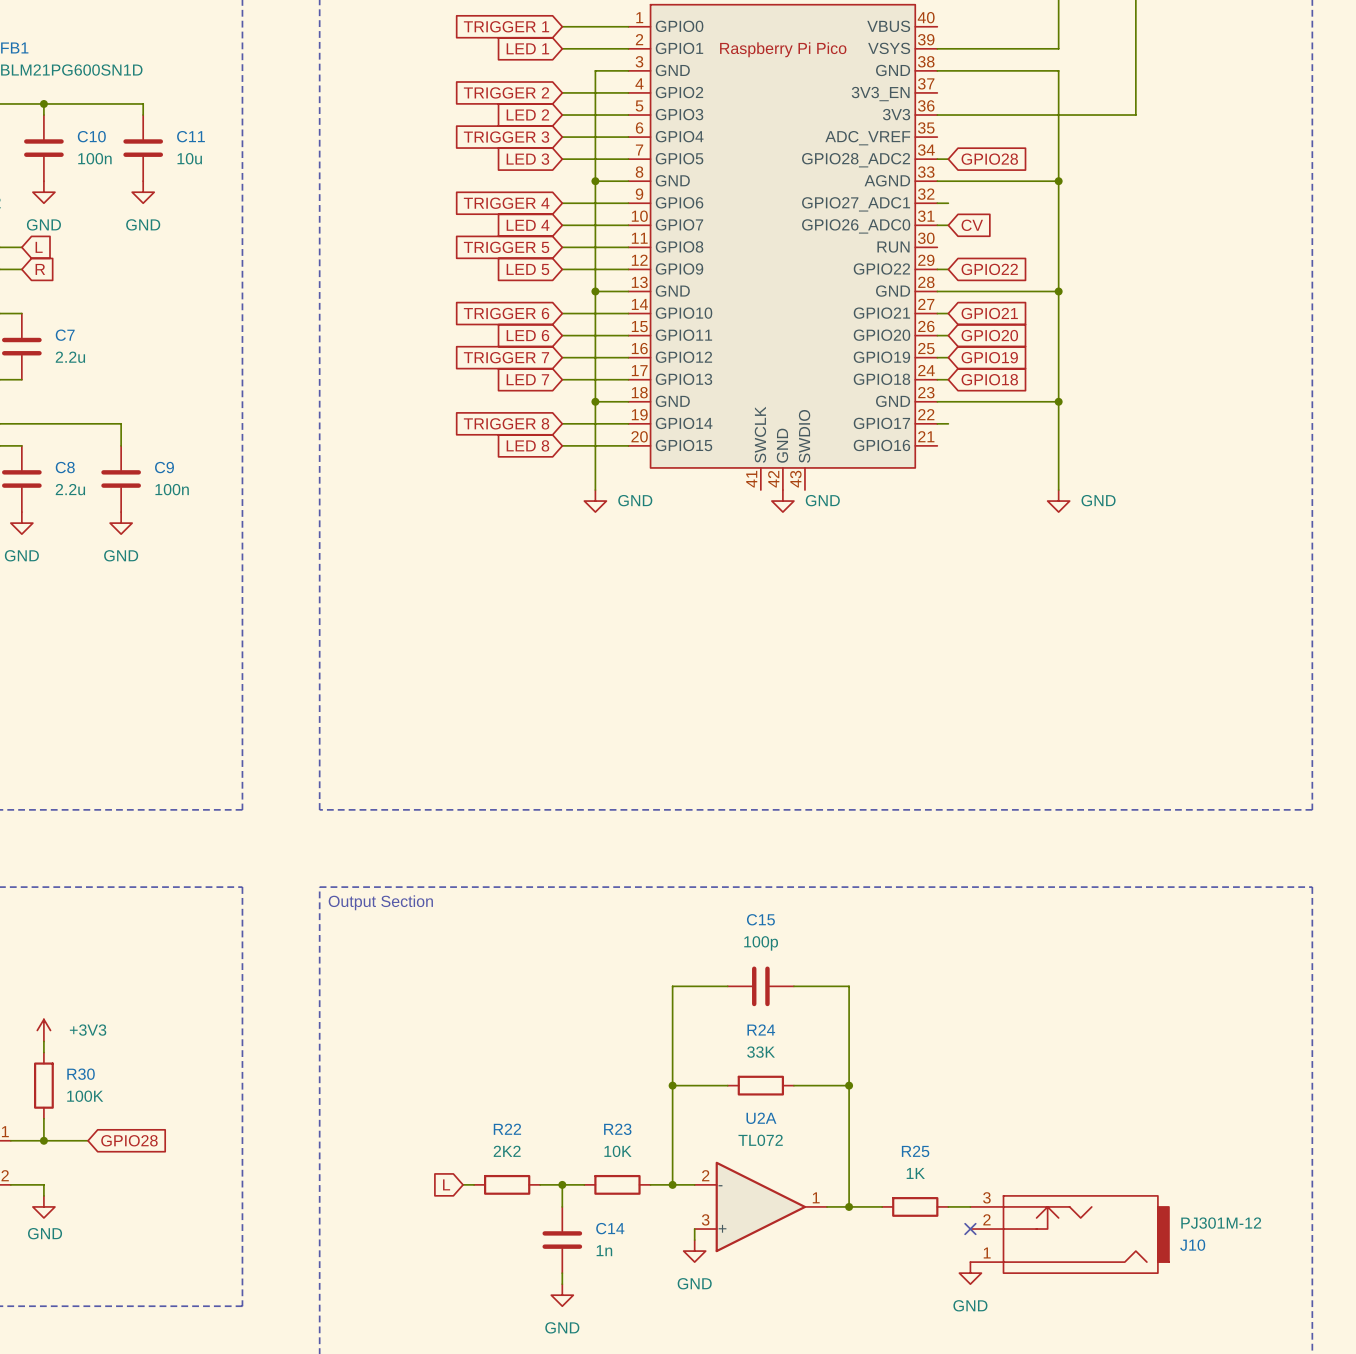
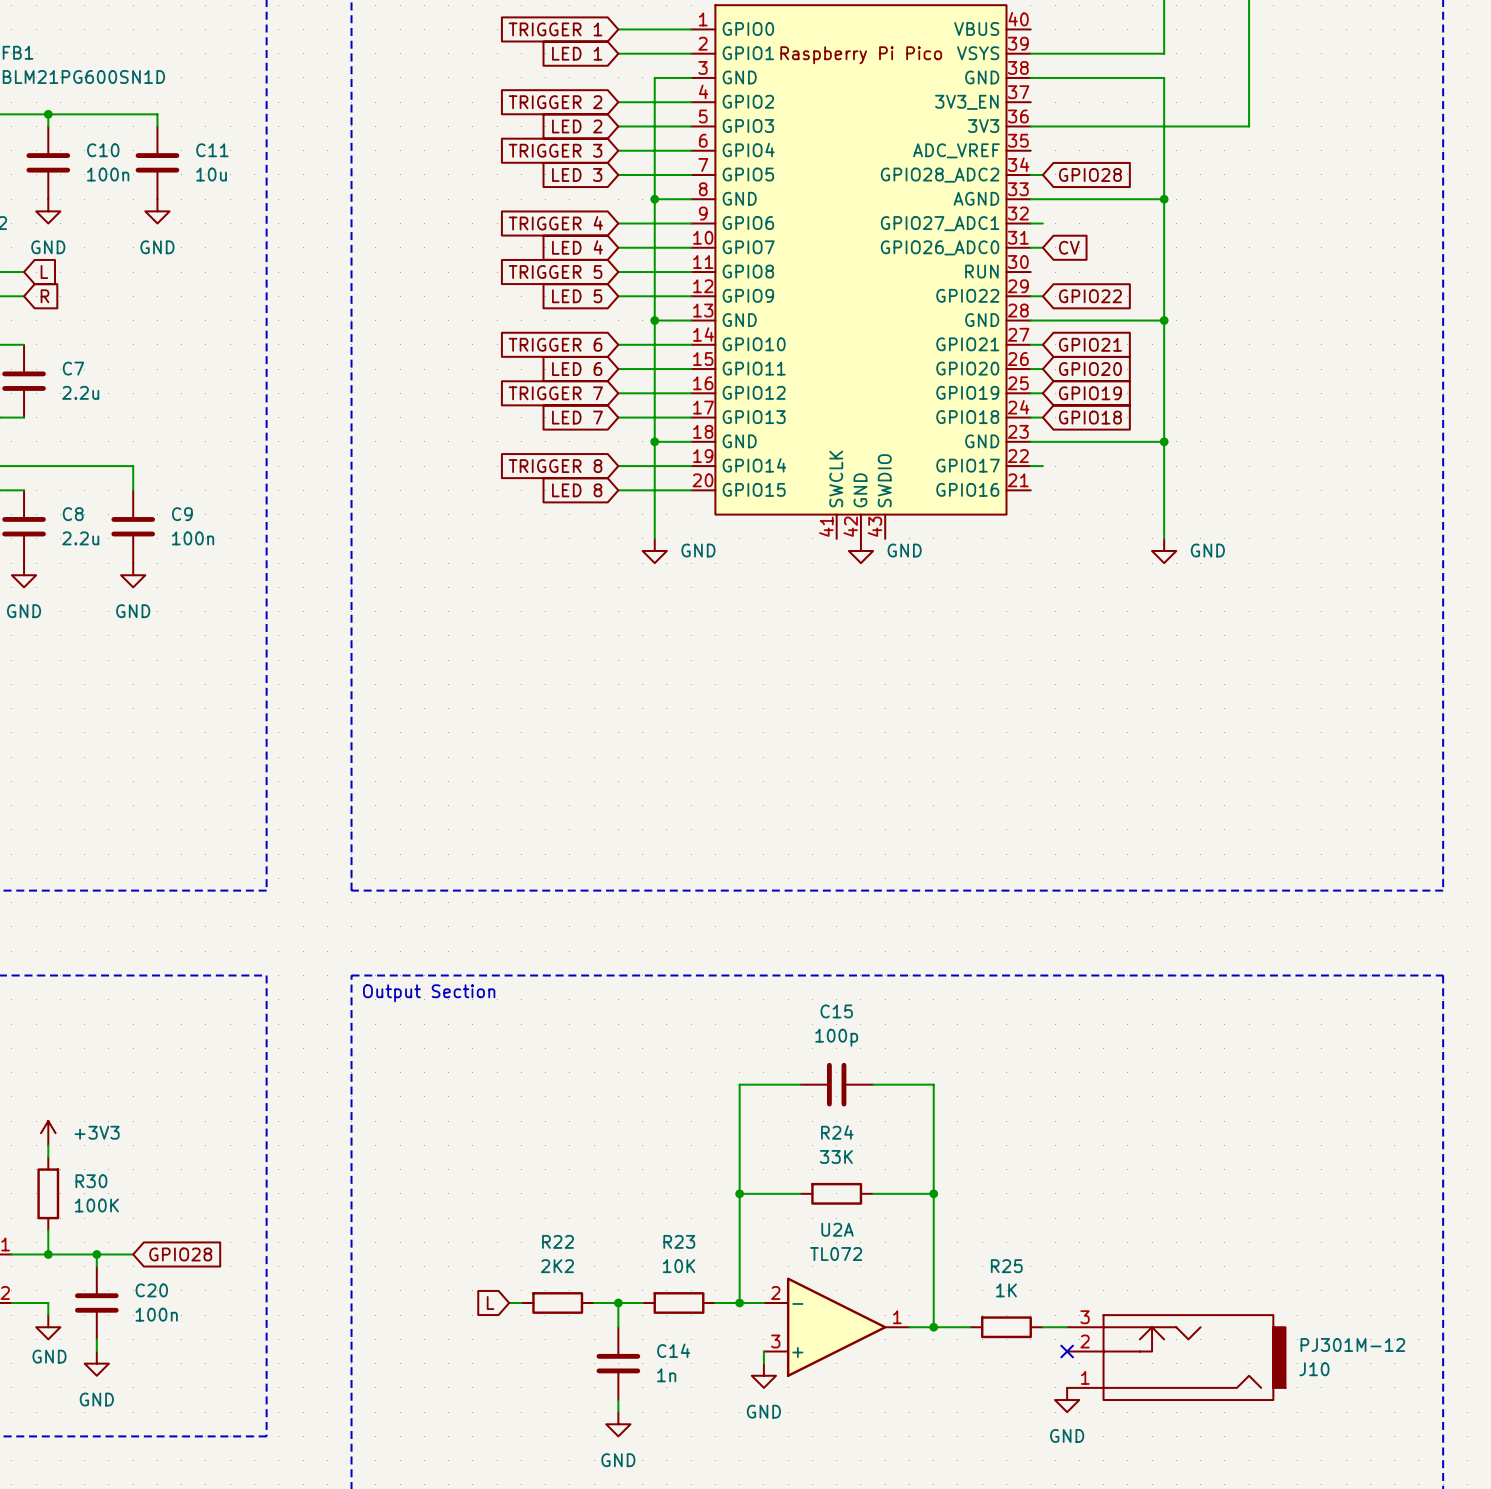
junction: none -> (96, 1254)
wire: none -> (133, 1254) (96, 1254) (96, 1266)
global label position: GPIO28 (129, 1140) -> GPIO28 (180, 1254)
C20: none -> 100n (96, 1302)
wire: none -> (96, 1339) (96, 1351)
power symbol: none -> GND (96, 1363)

